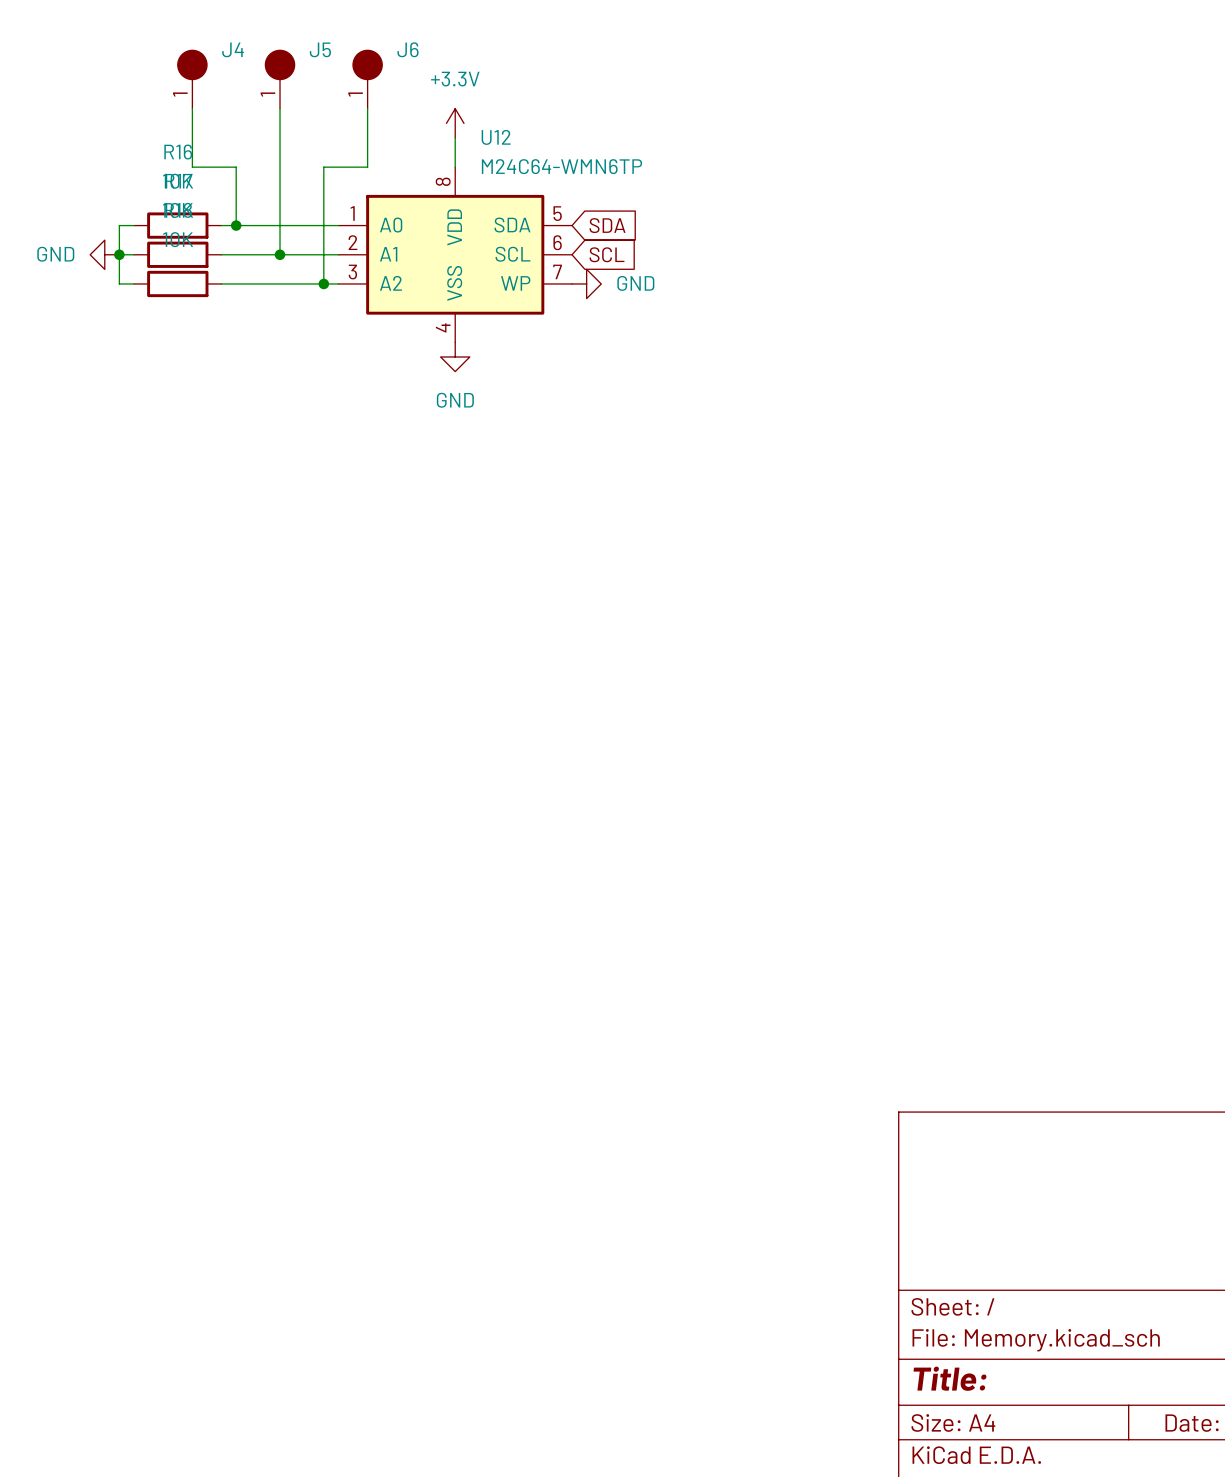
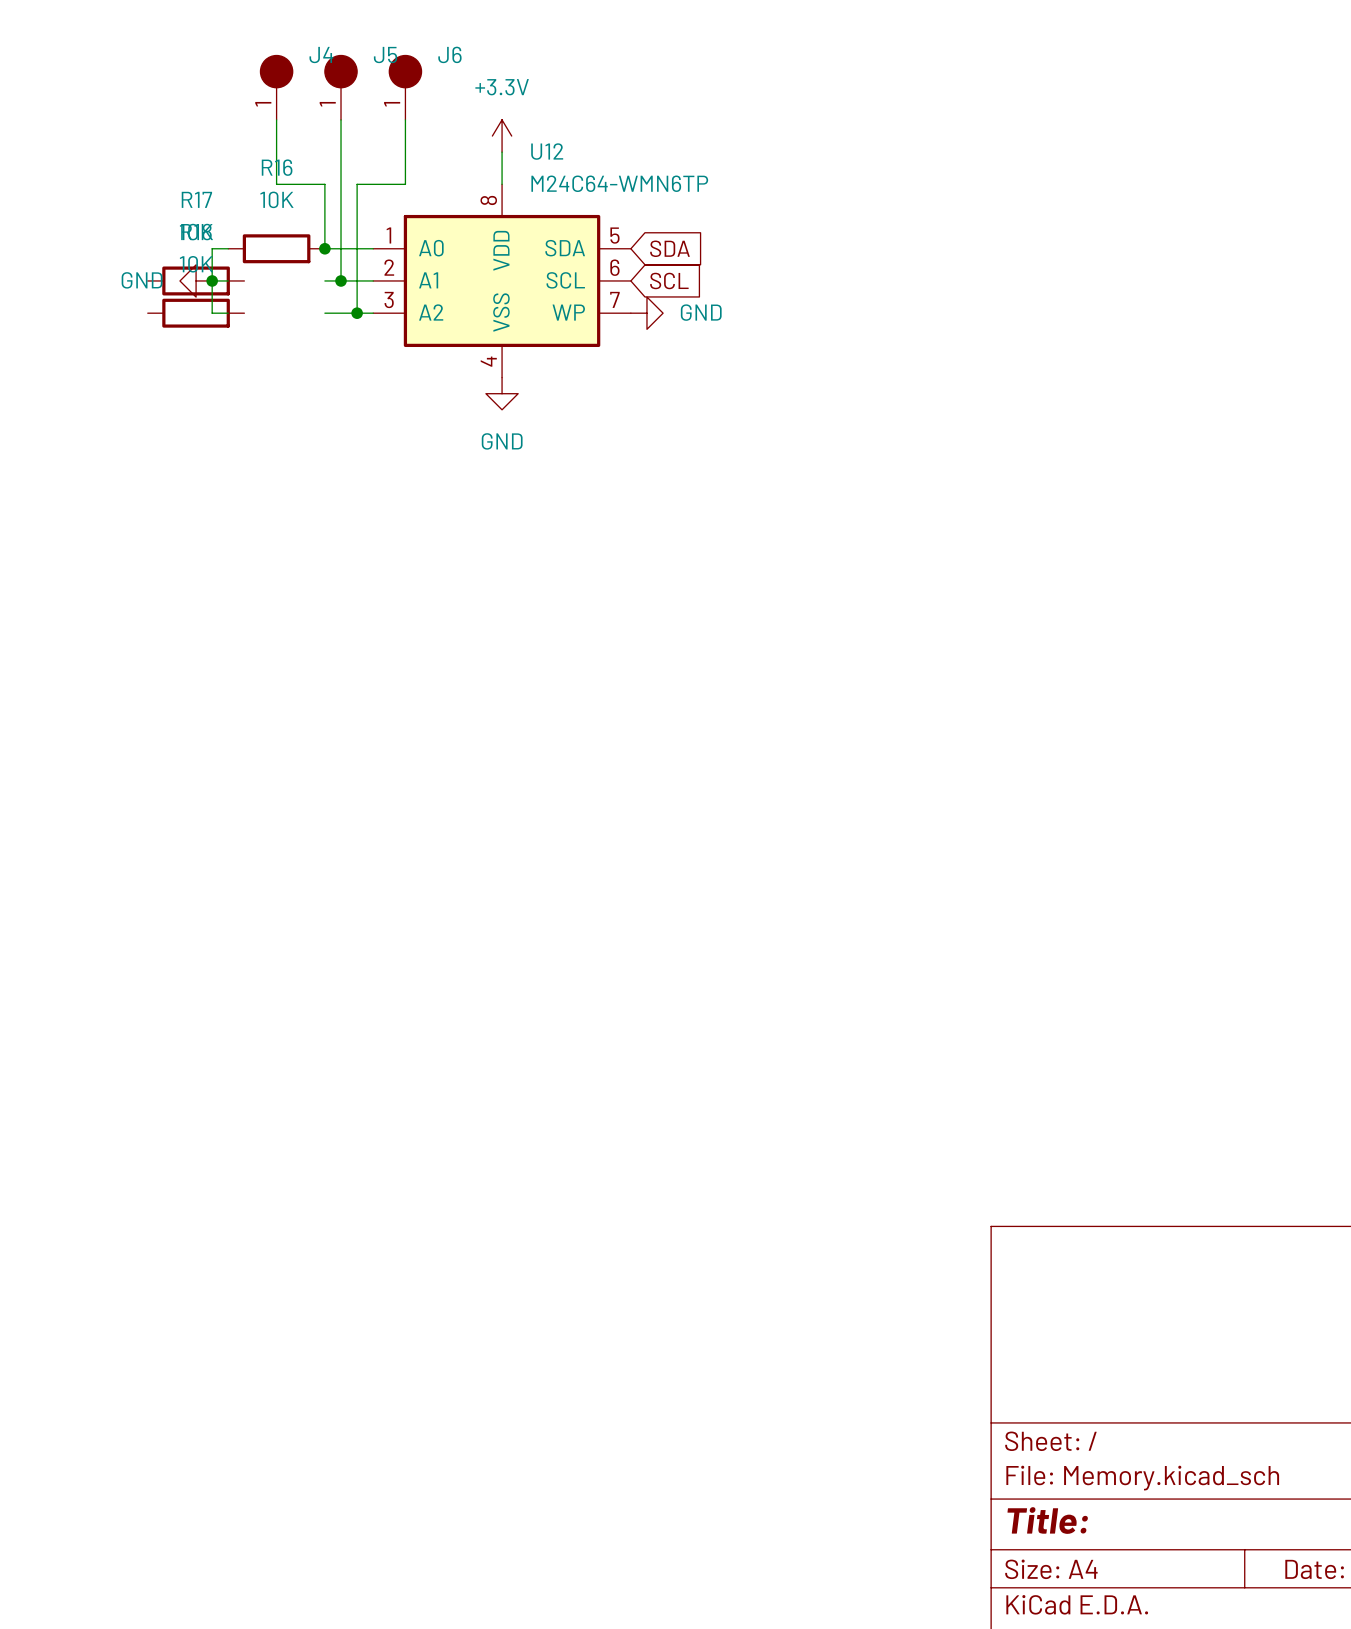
J4 position: (192, 79) -> (276, 87)
J5 position: (280, 79) -> (341, 87)
wire: (192, 108) (192, 167) (236, 167) (236, 225) -> none
wire: (280, 108) (280, 254) -> (341, 119) (341, 280)
wire: (133, 225) (119, 225) (119, 283) (133, 283) -> (228, 248) (212, 248) (212, 313) (228, 313)
R16 position: (177, 225) -> (276, 248)
wire: (221, 225) (294, 225) -> (276, 119) (276, 184) (324, 184) (324, 248)
junction: (236, 225) -> none
junction: none -> (324, 248)
power symbol position: GND (104, 254) -> GND (196, 280)
wire: (119, 254) (133, 254) -> (212, 280) (228, 280)
junction: (119, 254) -> none
junction: none -> (212, 280)
wire: (221, 254) (294, 254) -> none
junction: (280, 254) -> none
junction: none -> (341, 280)
wire: (221, 283) (294, 283) -> none

